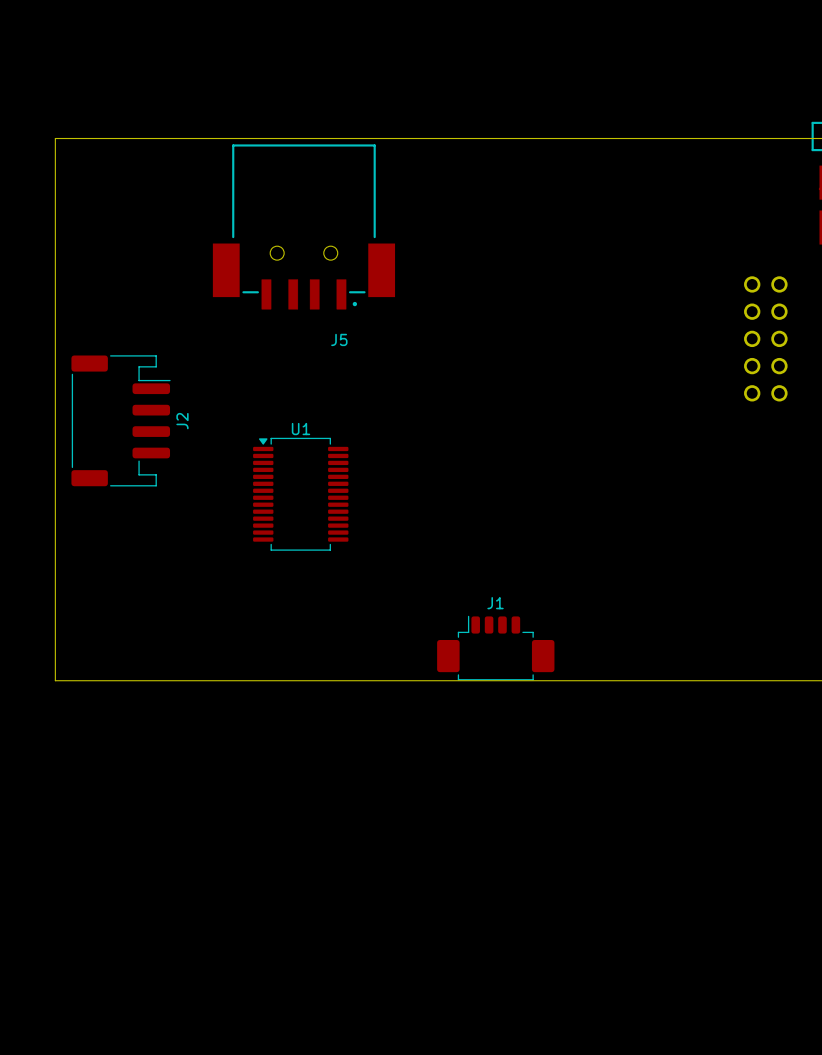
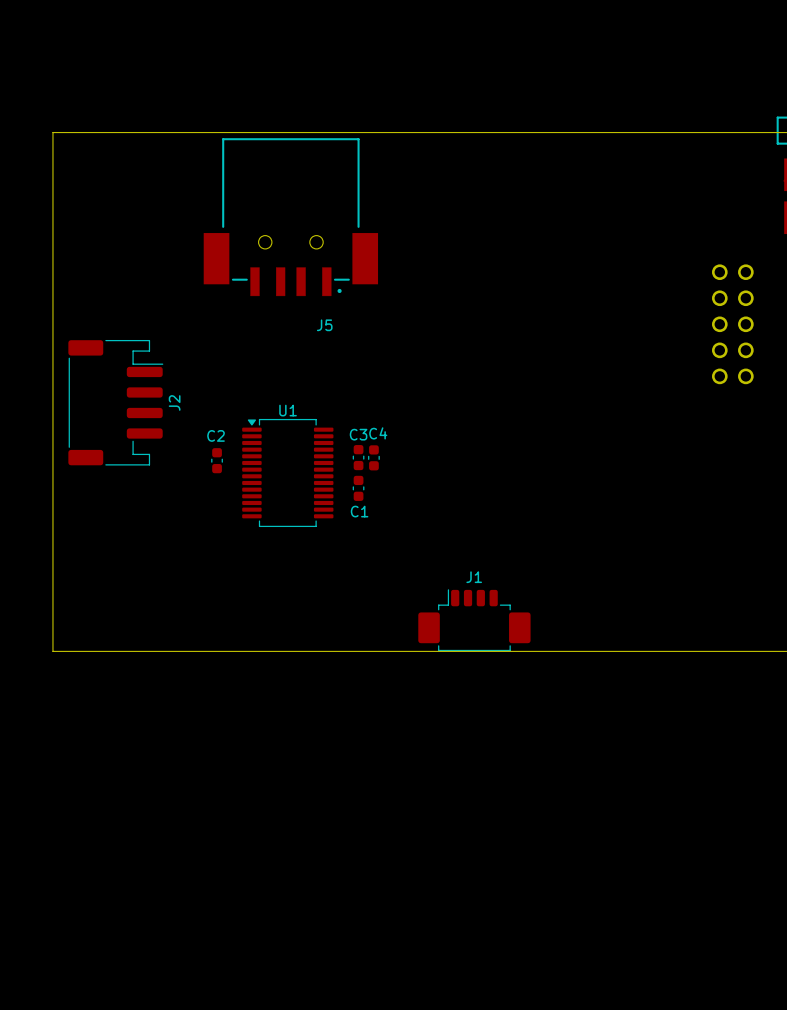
C3: none -> (358, 457)
C4: none -> (373, 457)
C2: none -> (217, 460)
C1: none -> (358, 488)

